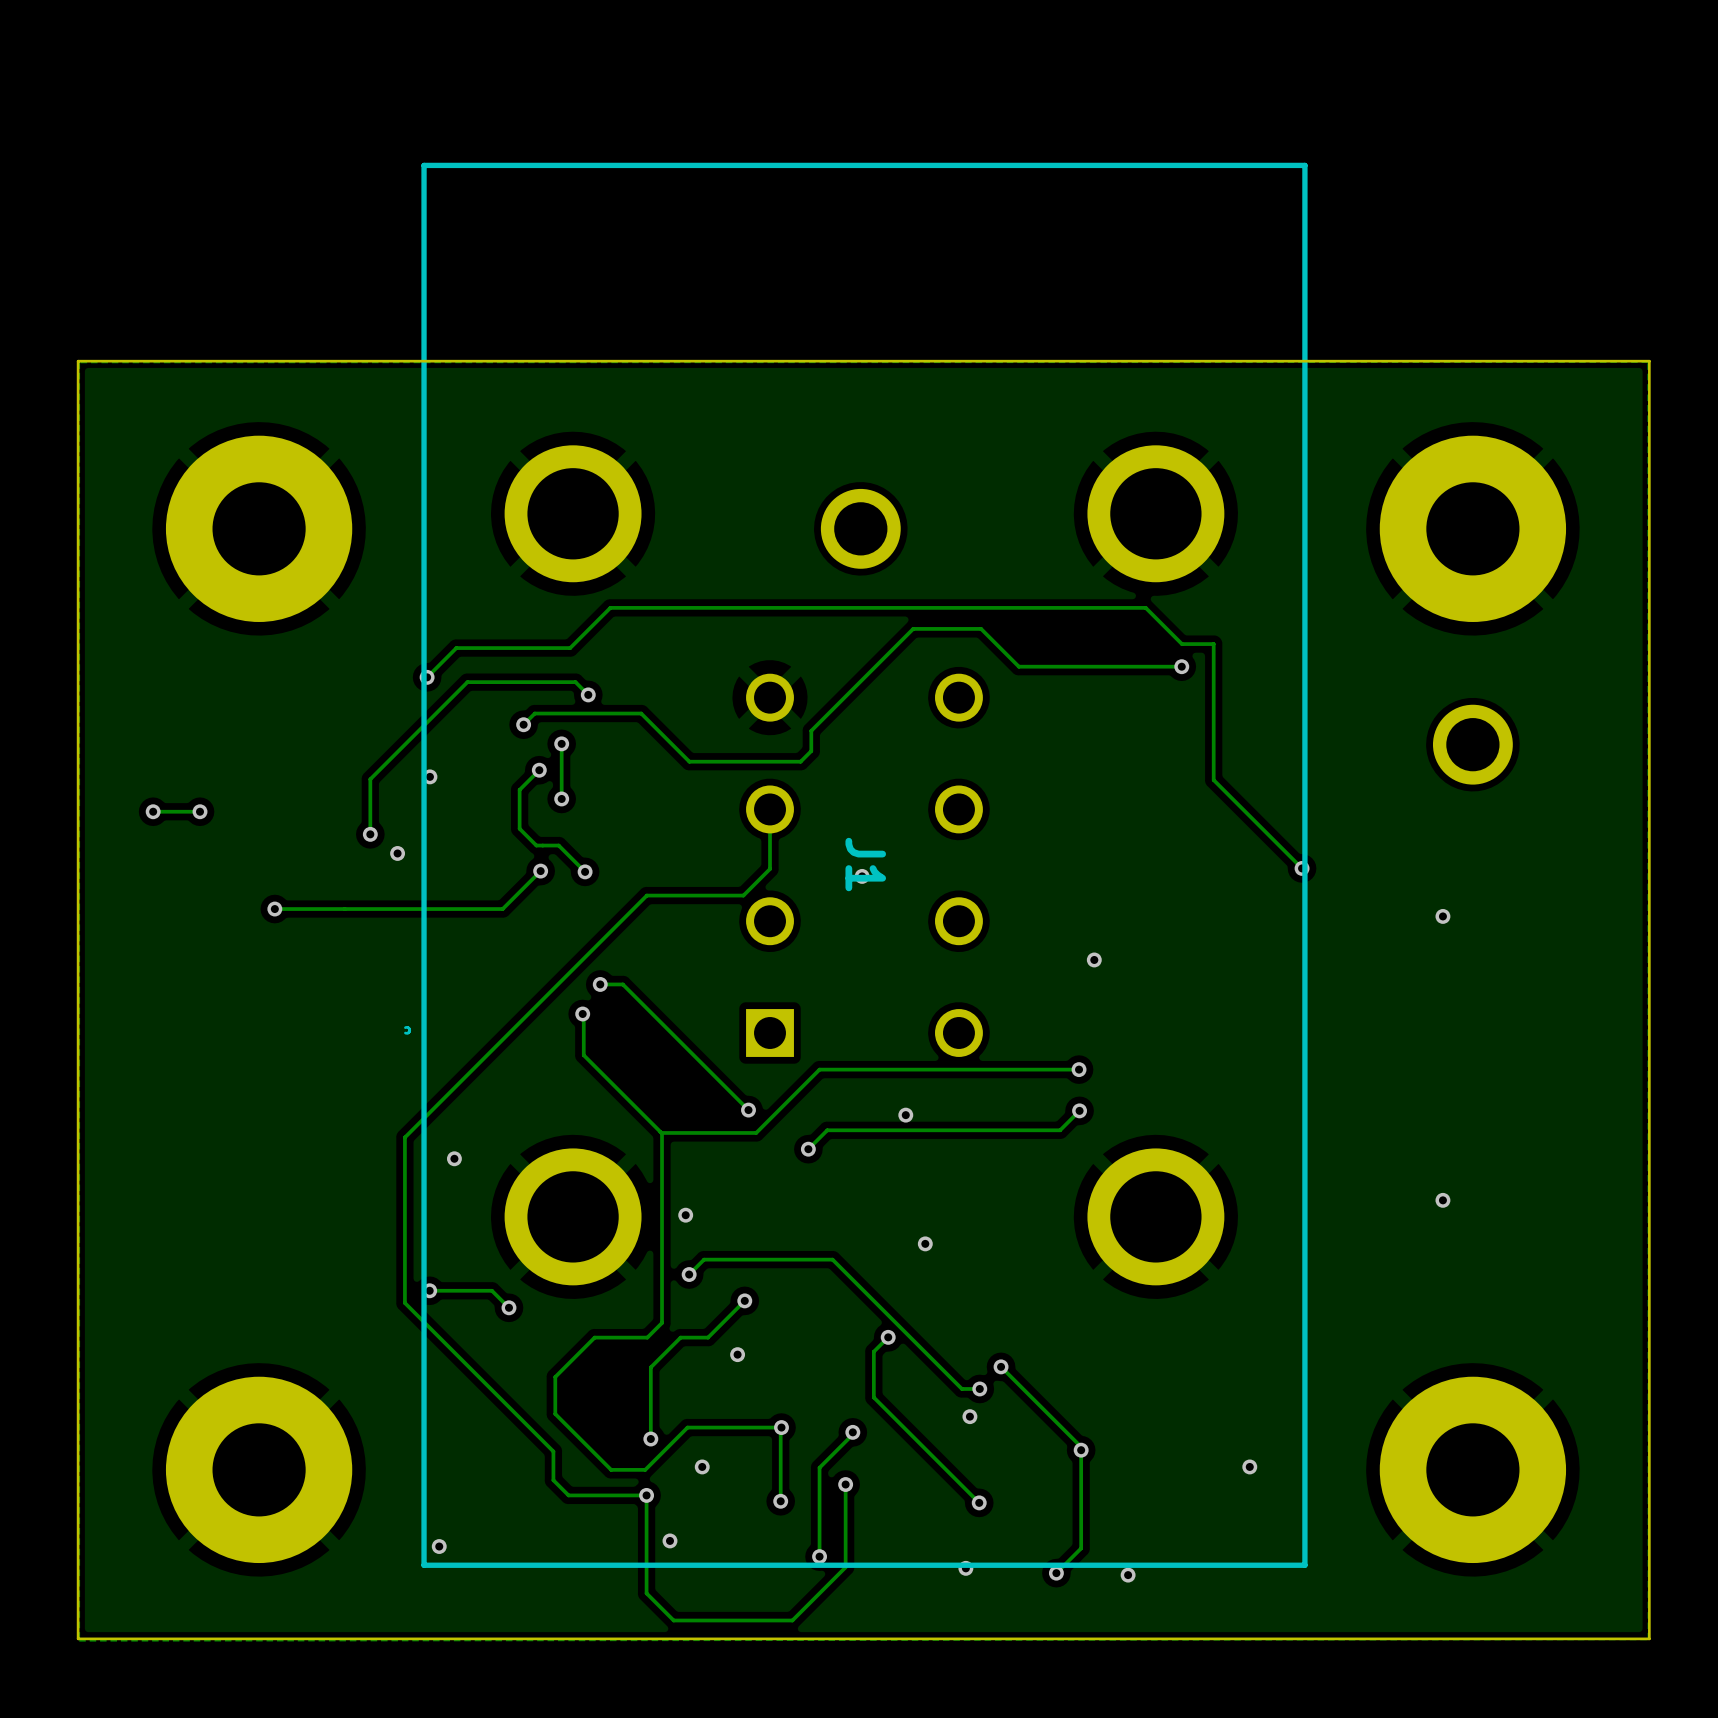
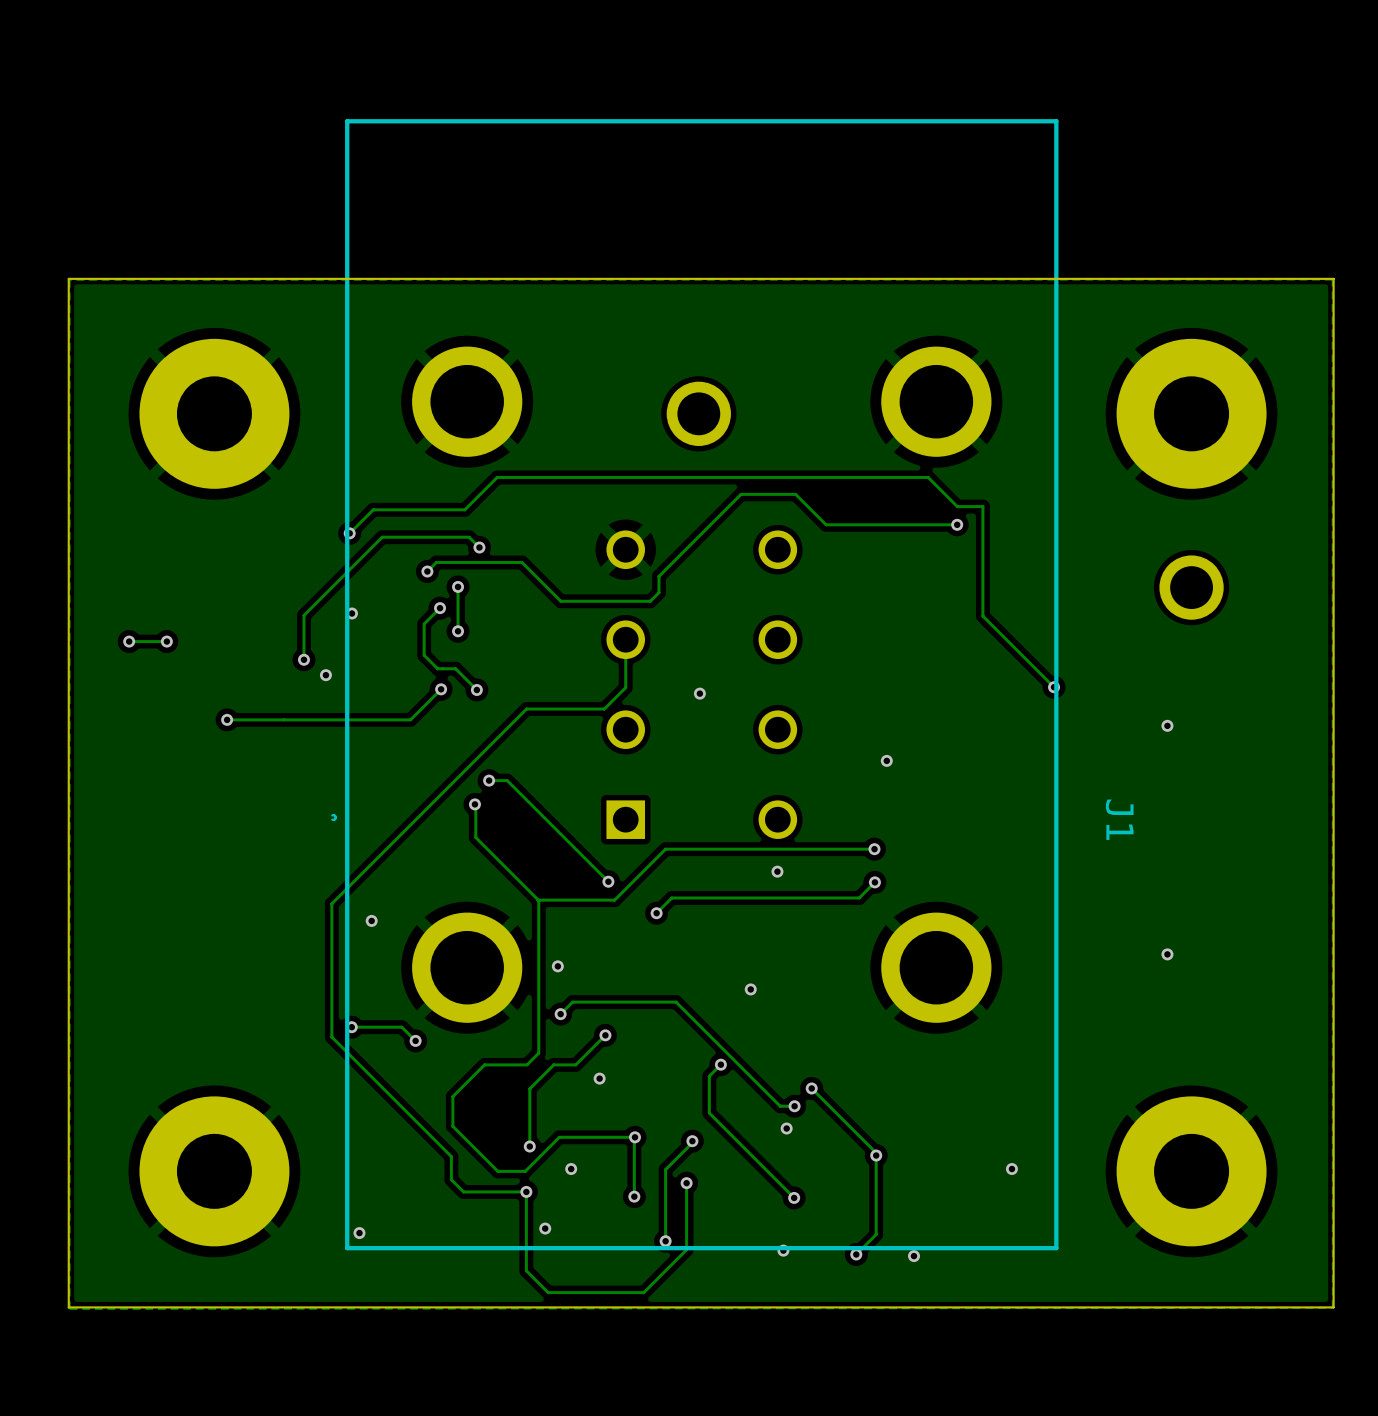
J1 name position: J1 (865, 864) -> J1 (1119, 819)
via position: (905, 1115) -> (777, 871)

